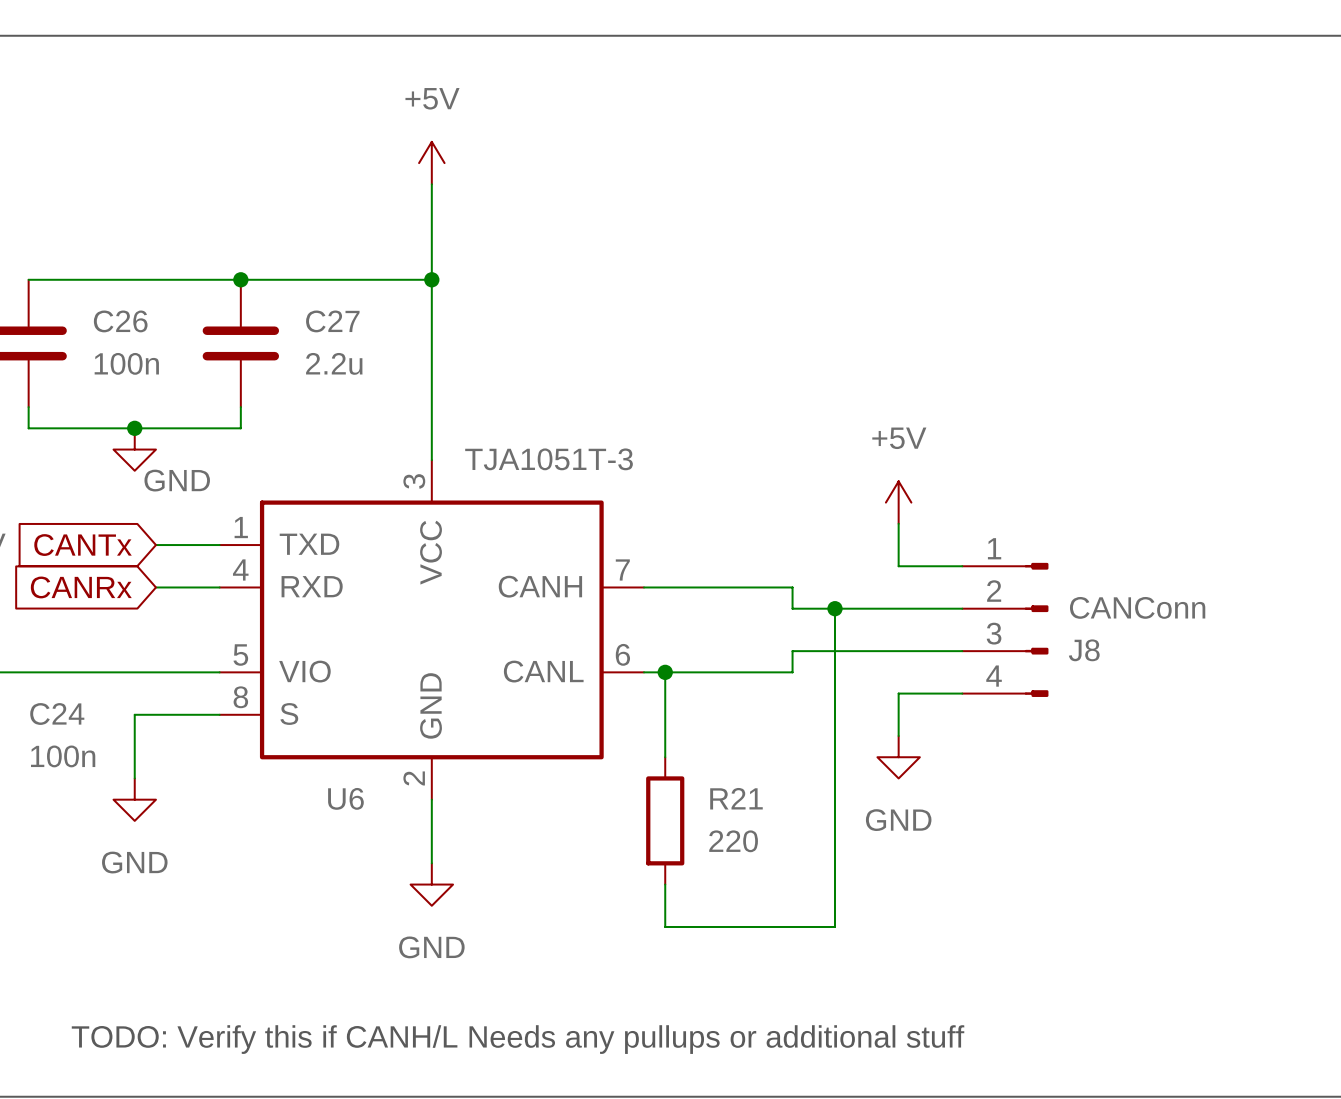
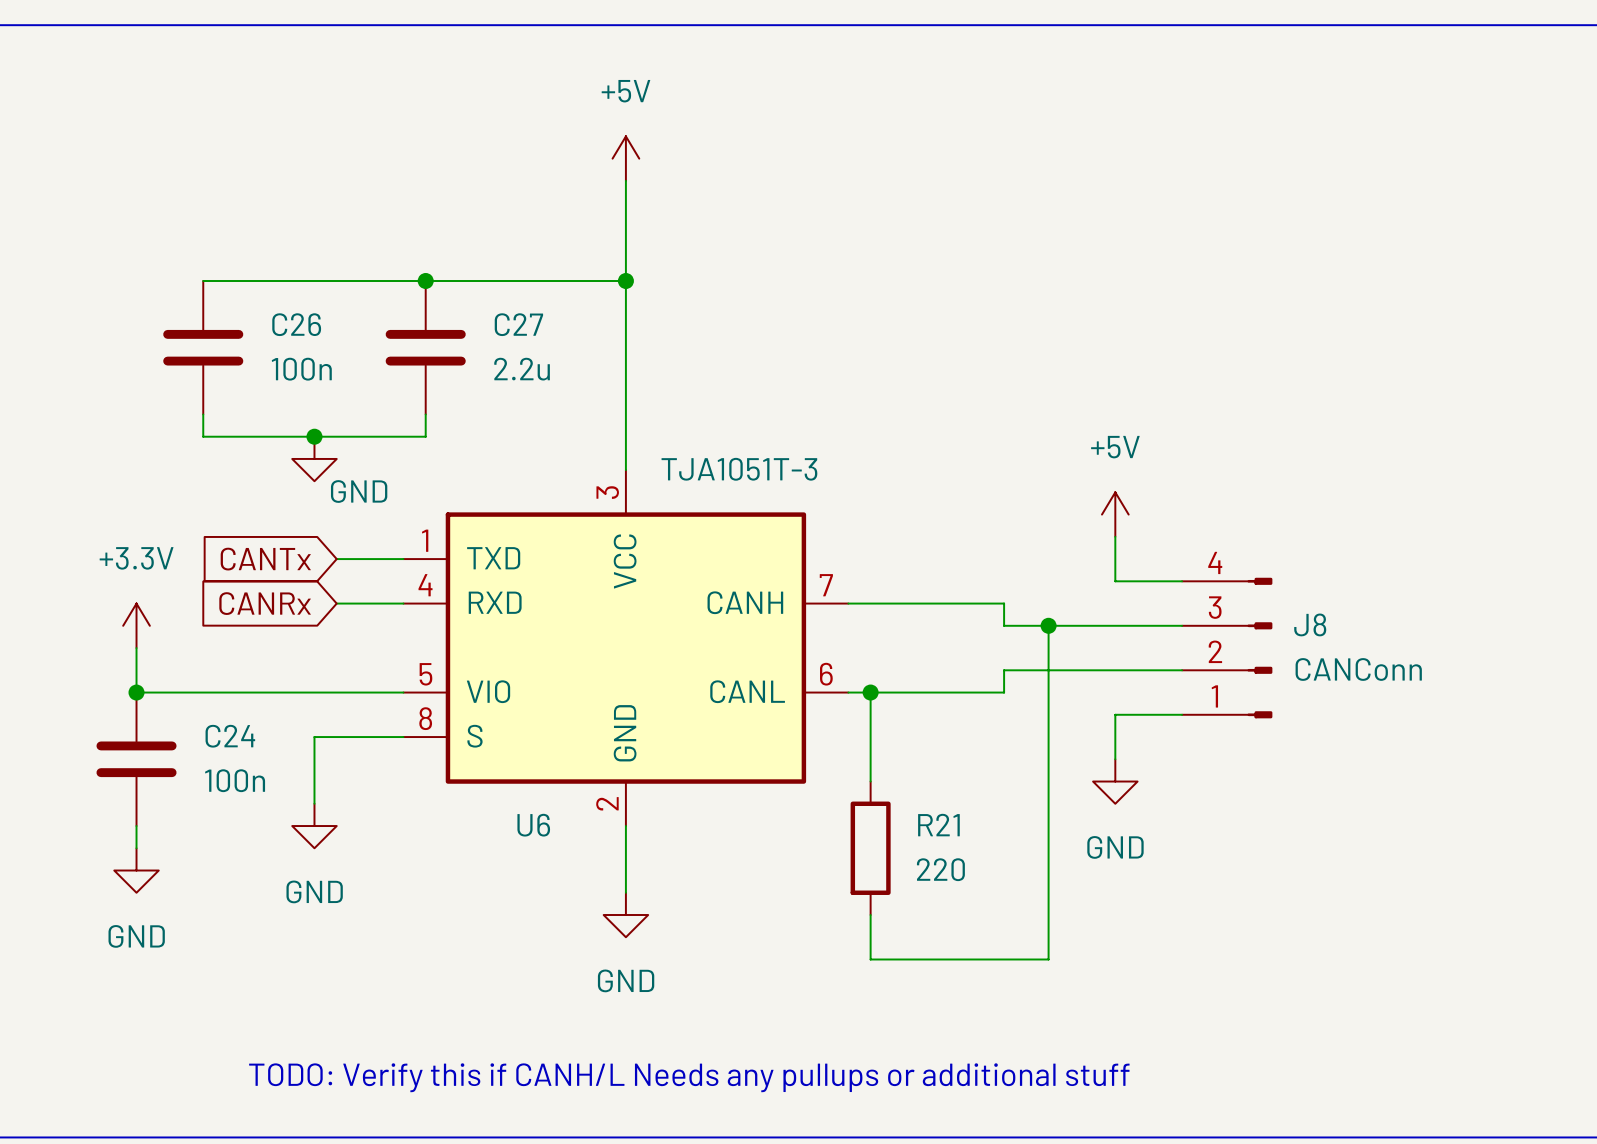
J8 flip: as is (1036, 629) -> up-down (1259, 648)

